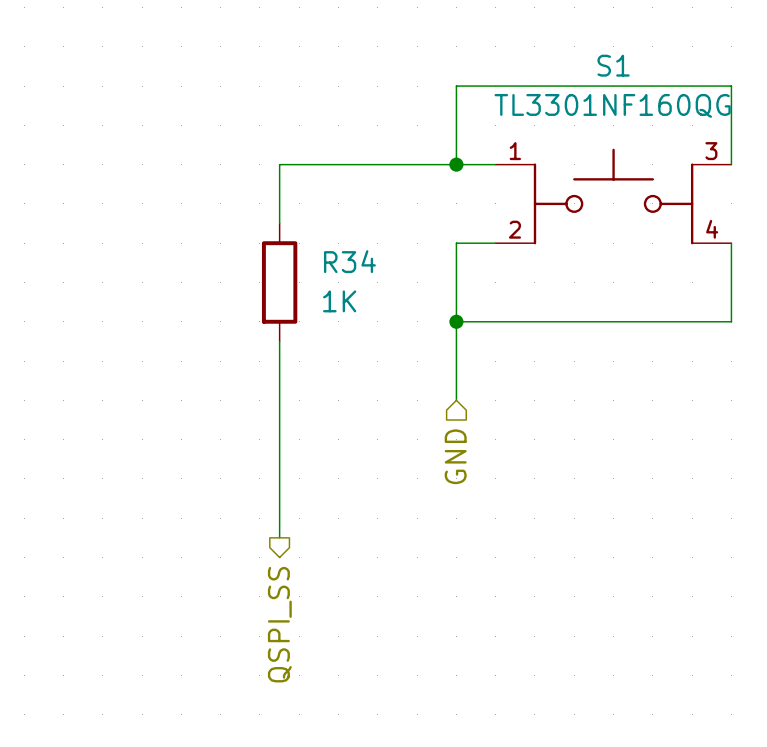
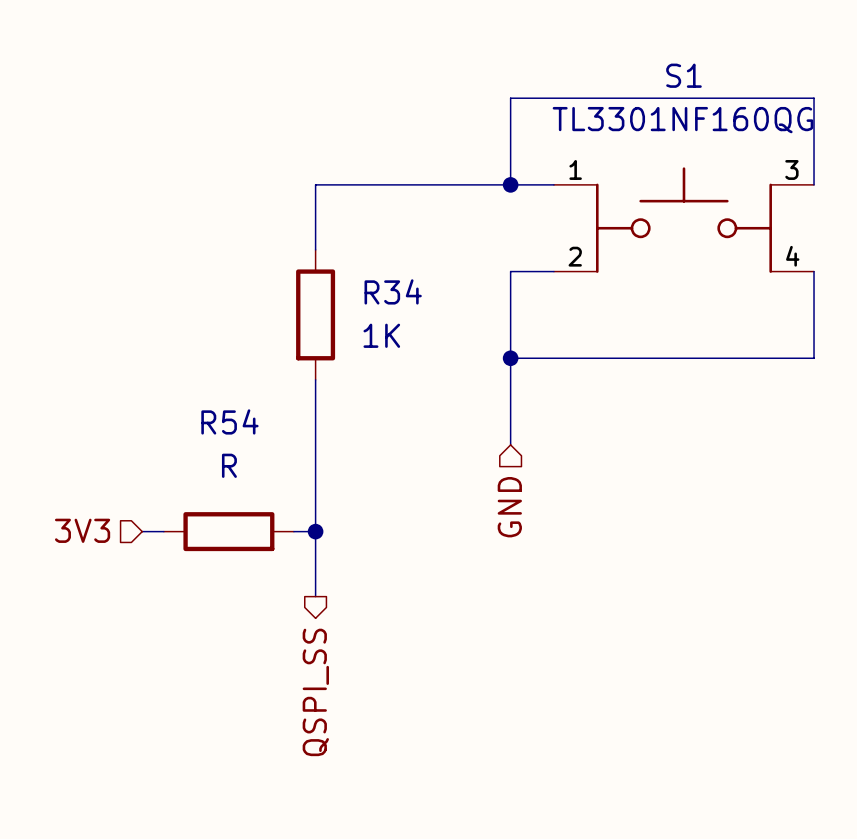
hierarchical label: none -> 3V3 (82, 530)
wire: none -> (142, 531) (163, 531)
R54: none -> R (228, 531)
wire: none -> (293, 531) (315, 531)
junction: none -> (315, 531)

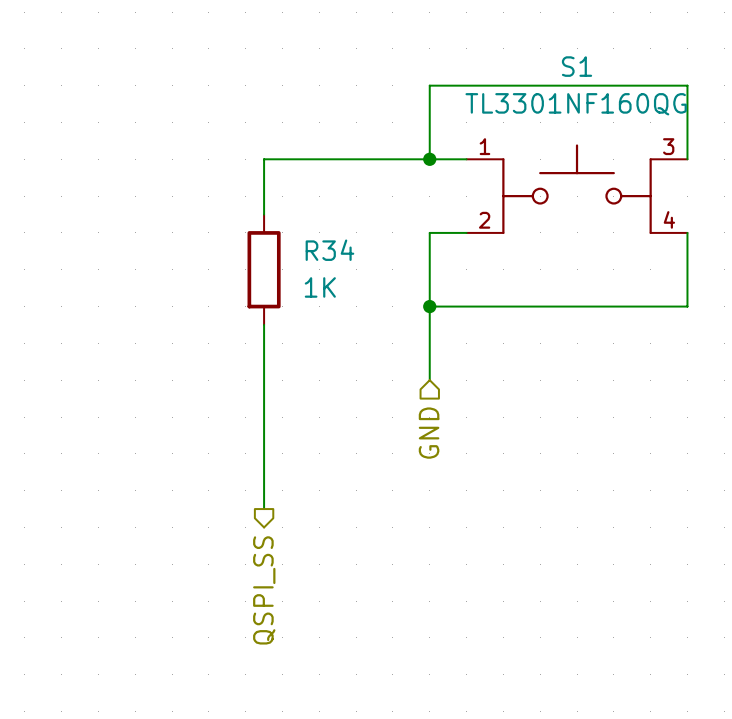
hierarchical label: 3V3 (82, 530) -> none
wire: (142, 531) (163, 531) -> none
R54: R (228, 531) -> none
wire: (293, 531) (315, 531) -> none
junction: (315, 531) -> none

